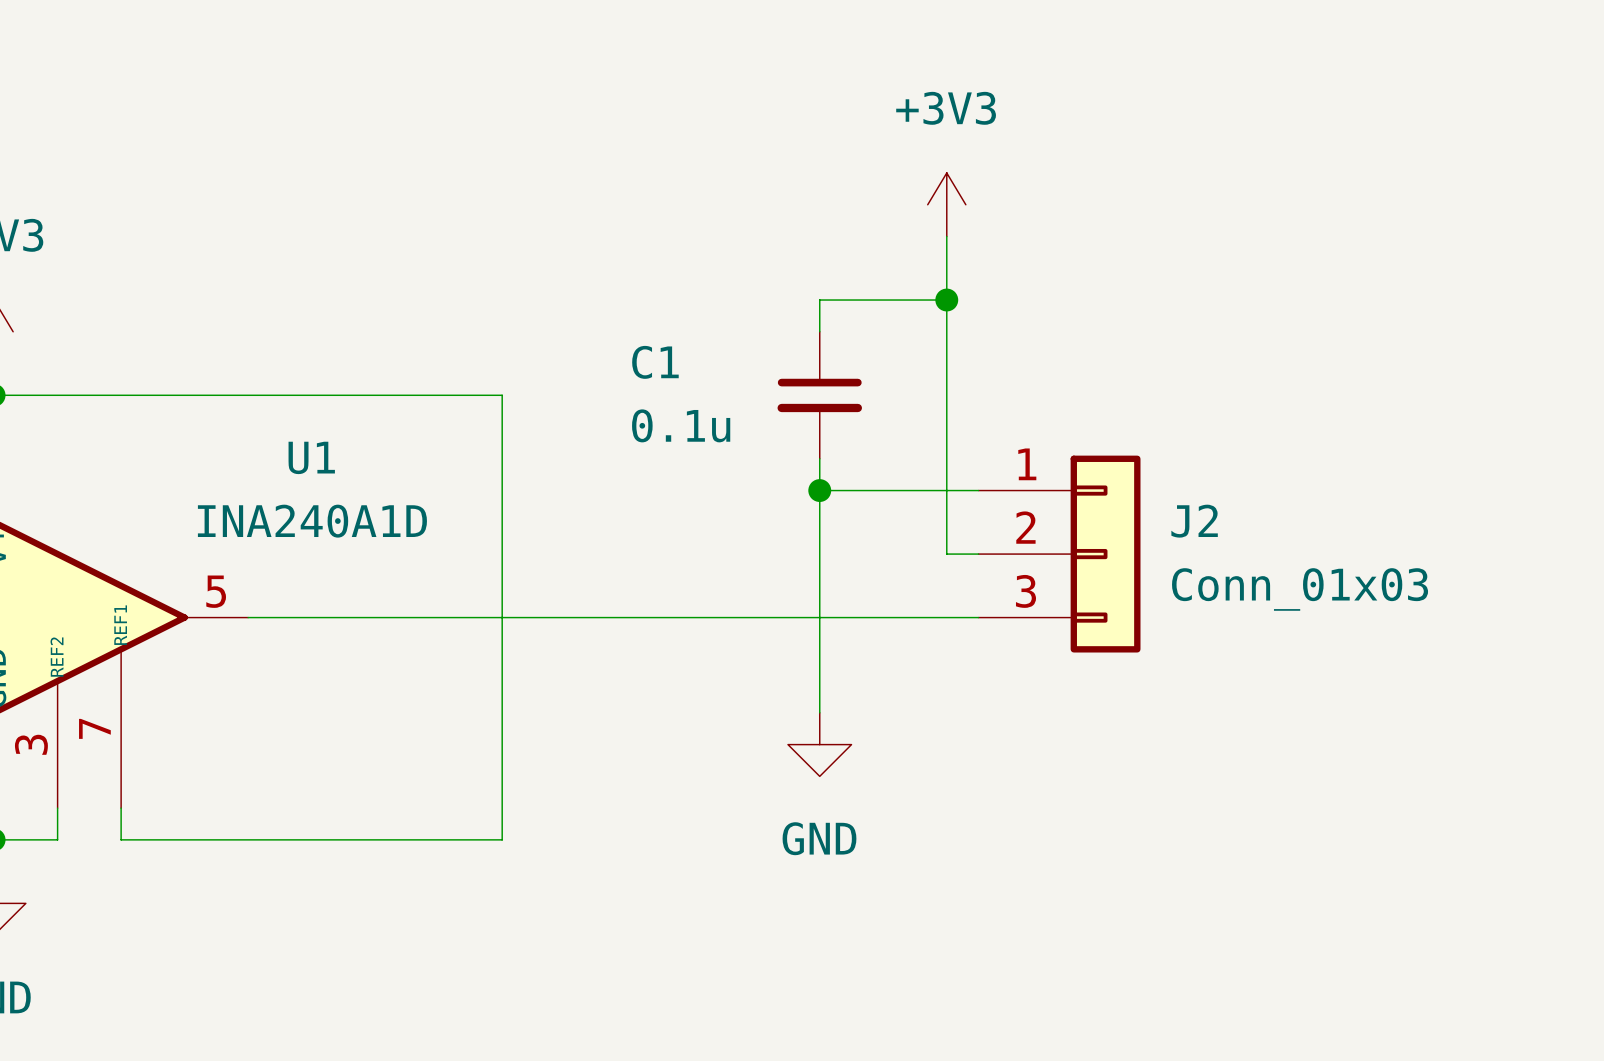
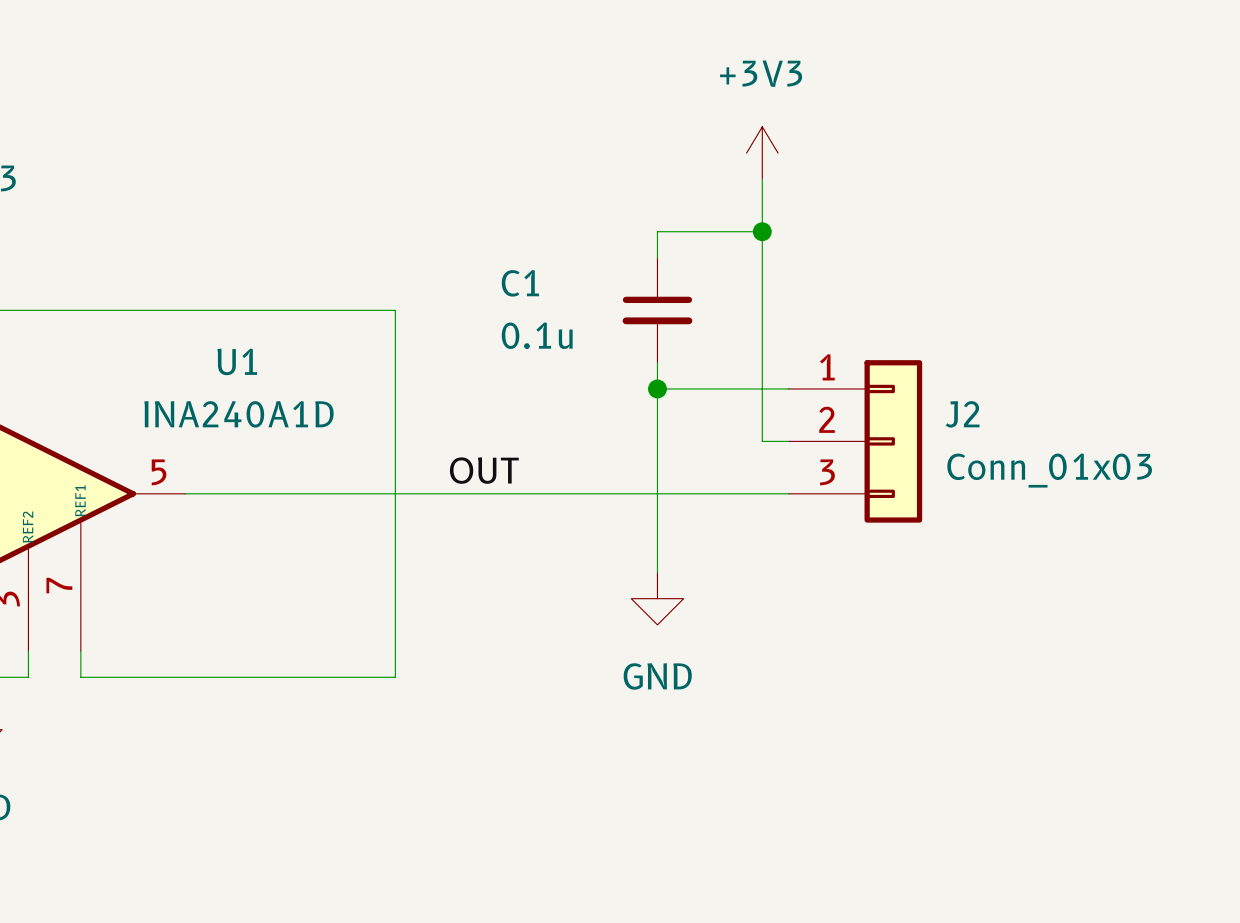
label: none -> OUT (484, 470)

